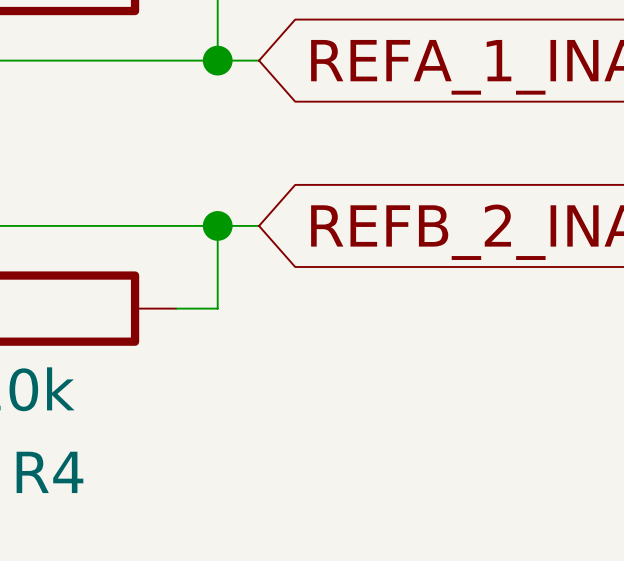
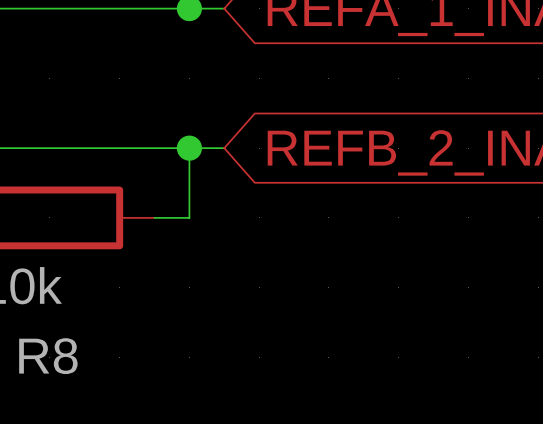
R4 name: R4 (49, 472) -> R8 (48, 356)

